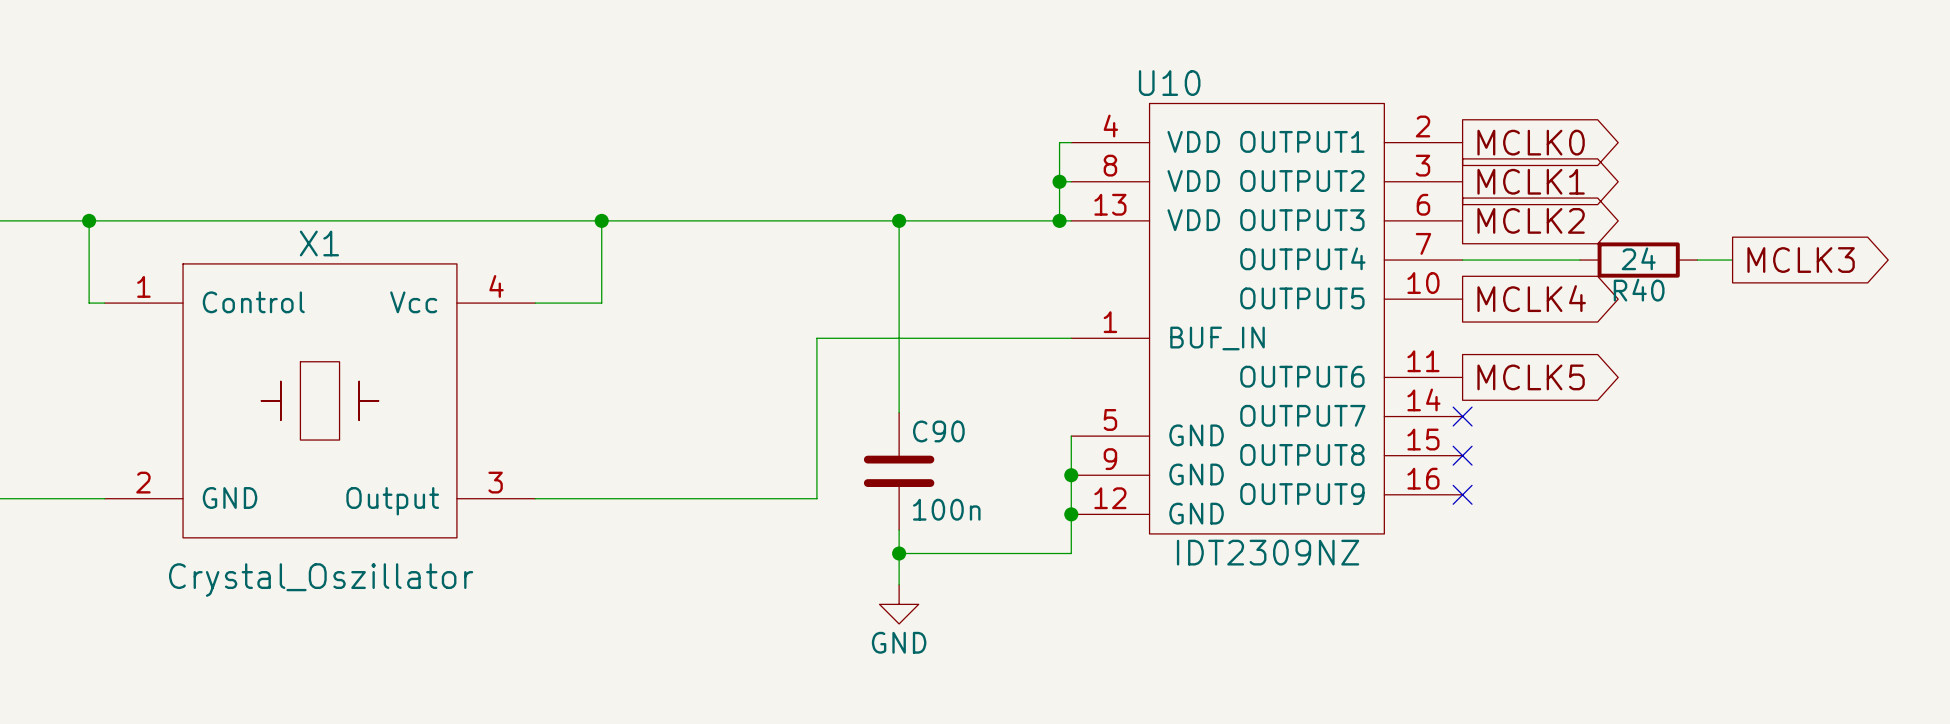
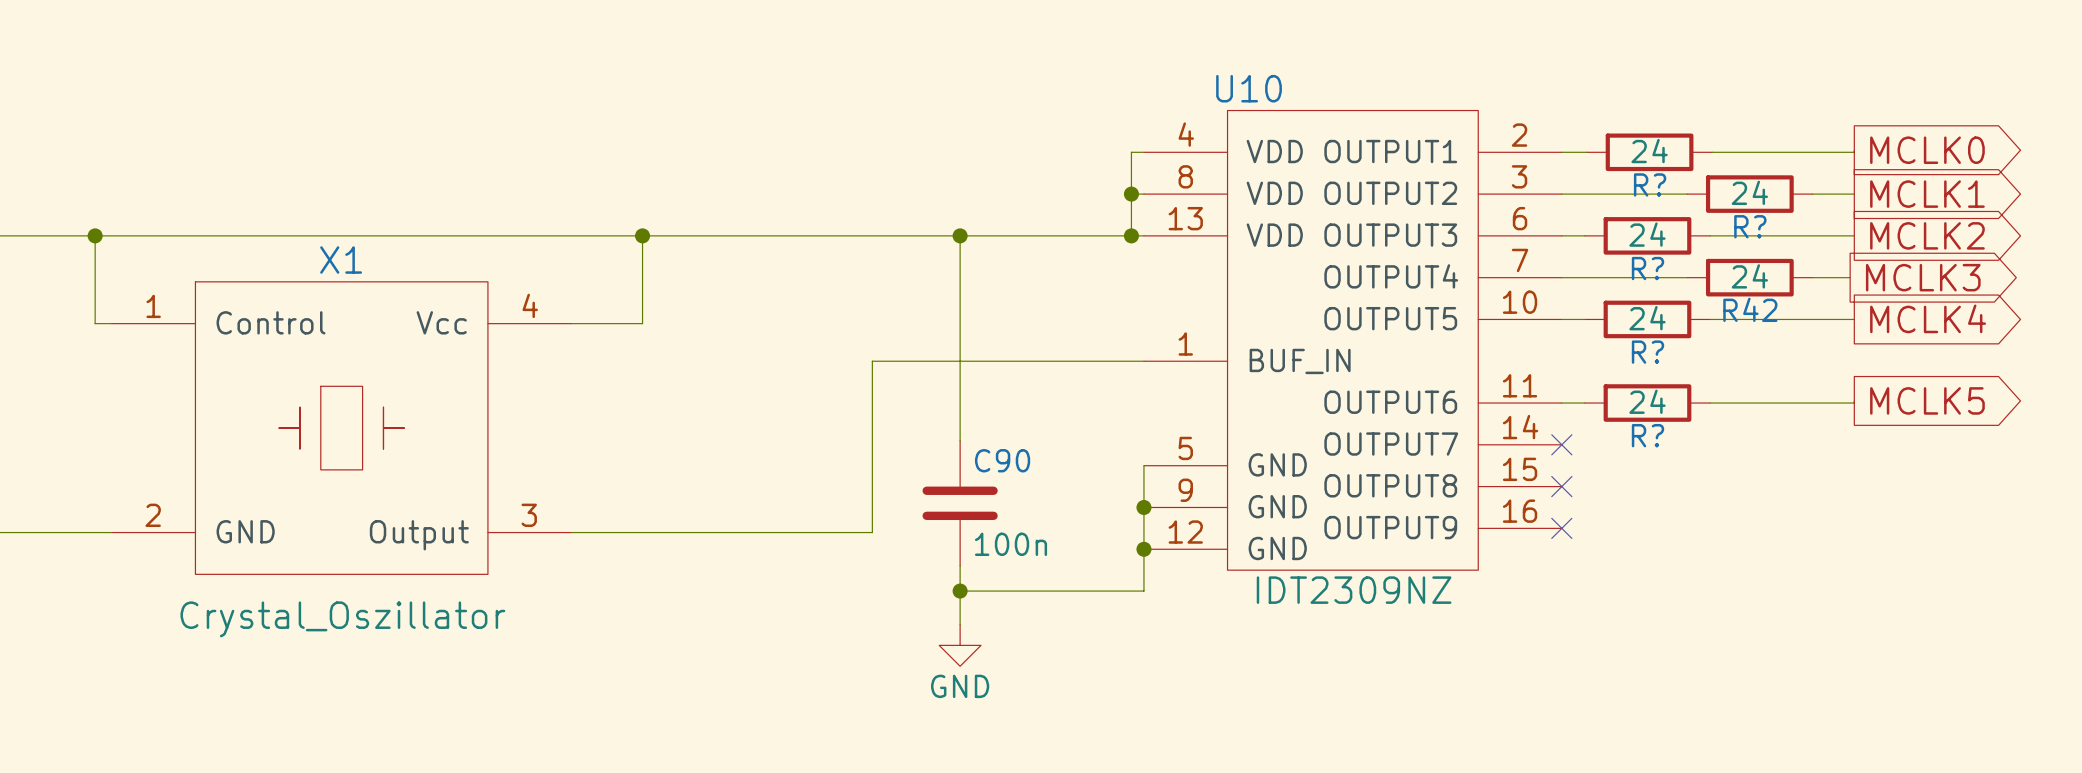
wire: none -> (1854, 150) (1854, 152) (1712, 152)
wire: none -> (1561, 152) (1586, 152)
global label position: MCLK0 (1531, 142) -> MCLK0 (1927, 150)
R?: none -> 24 (1649, 152)
wire: none -> (1561, 194) (1687, 194)
global label position: MCLK1 (1531, 181) -> MCLK1 (1927, 194)
R?: none -> 24 (1749, 194)
wire: none -> (1812, 194) (1854, 194)
wire: none -> (1561, 235) (1584, 235)
global label position: MCLK2 (1531, 220) -> MCLK2 (1927, 235)
R?: none -> 24 (1647, 235)
wire: none -> (1710, 235) (1854, 235)
R40 name: R40 (1639, 290) -> R42 (1750, 309)
global label position: MCLK4 (1531, 298) -> MCLK4 (1928, 318)
wire: none -> (1561, 319) (1584, 319)
R?: none -> 24 (1647, 319)
wire: none -> (1710, 319) (1854, 319)
wire: none -> (1854, 400) (1854, 403) (1710, 403)
wire: none -> (1561, 403) (1584, 403)
global label position: MCLK5 (1531, 377) -> MCLK5 (1927, 400)
R?: none -> 24 (1647, 403)

